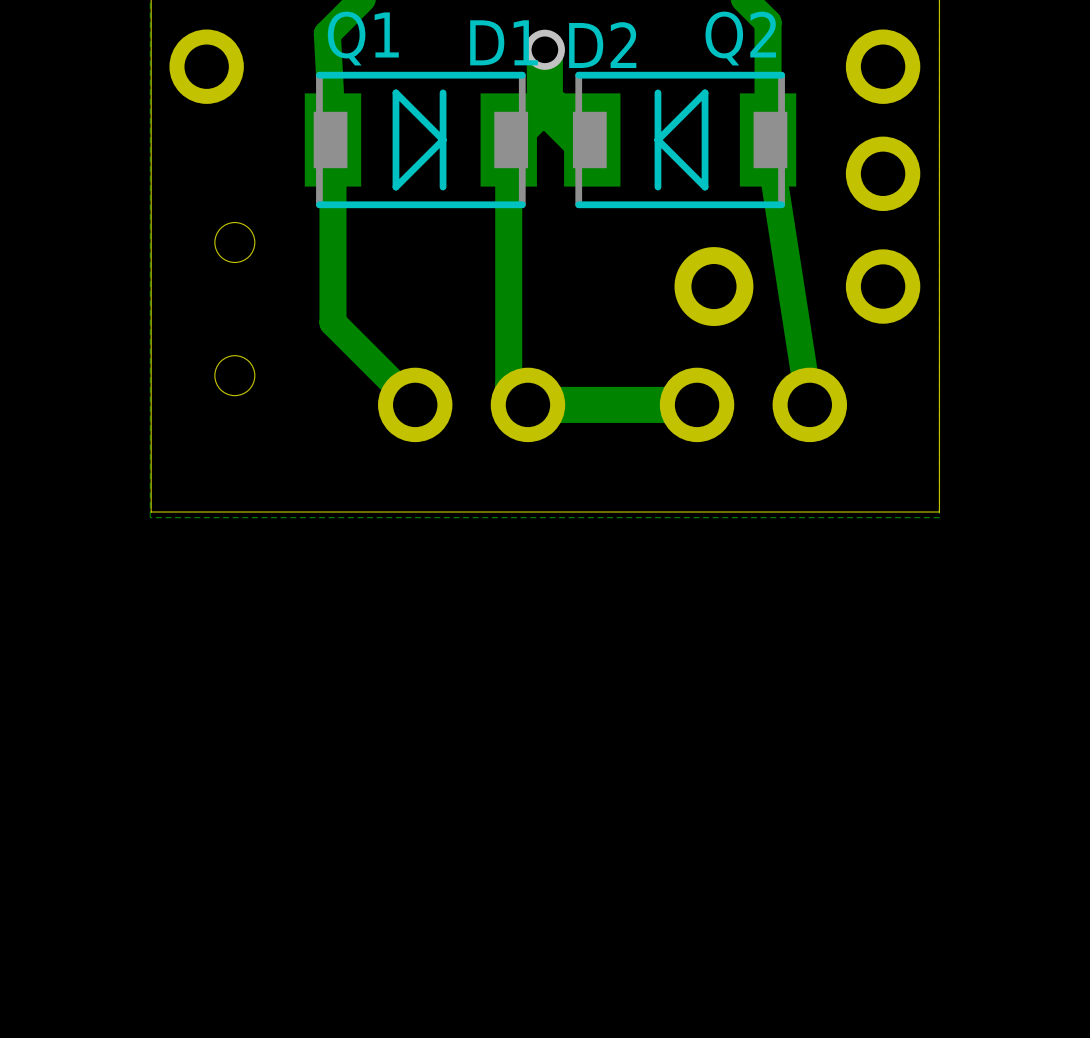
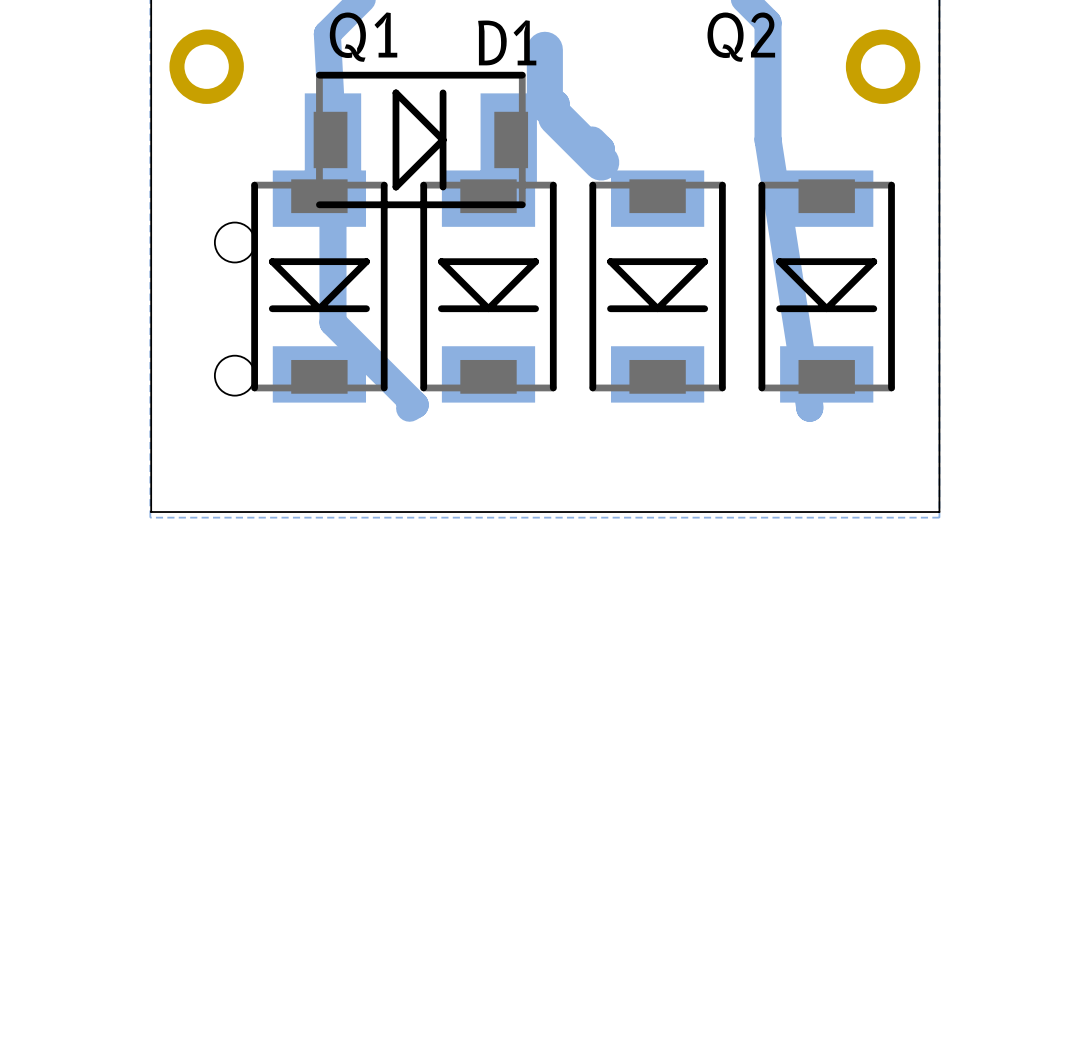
via: (544, 49) -> none
track: (544, 103) (508, 139) (508, 385) (527, 404) -> none
D2: (680, 139) -> none
part: (883, 230) -> none
part: none -> (319, 286)
part: none -> (488, 286)
part: none -> (657, 286)
part: (713, 286) -> none
part: none -> (826, 286)
part: (471, 404) -> none
track: (697, 404) (527, 404) -> none
part: (753, 404) -> none

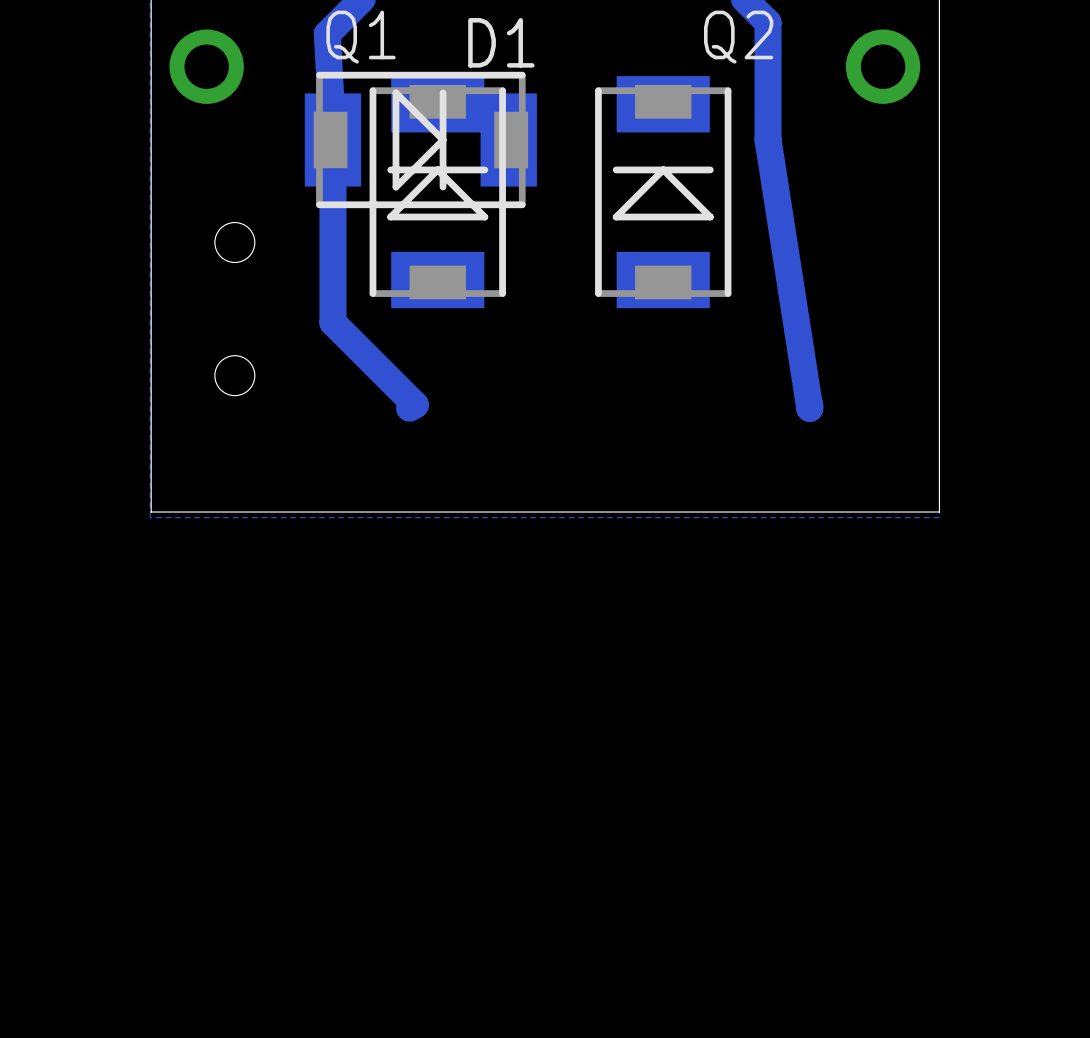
track: (544, 49) (544, 103) (556, 103) (556, 117) (601, 162) (601, 148) (592, 139) -> none
part: none -> (437, 192)
part: none -> (663, 192)
part: (319, 286) -> none
part: (488, 286) -> none
part: (657, 286) -> none
part: (826, 286) -> none

